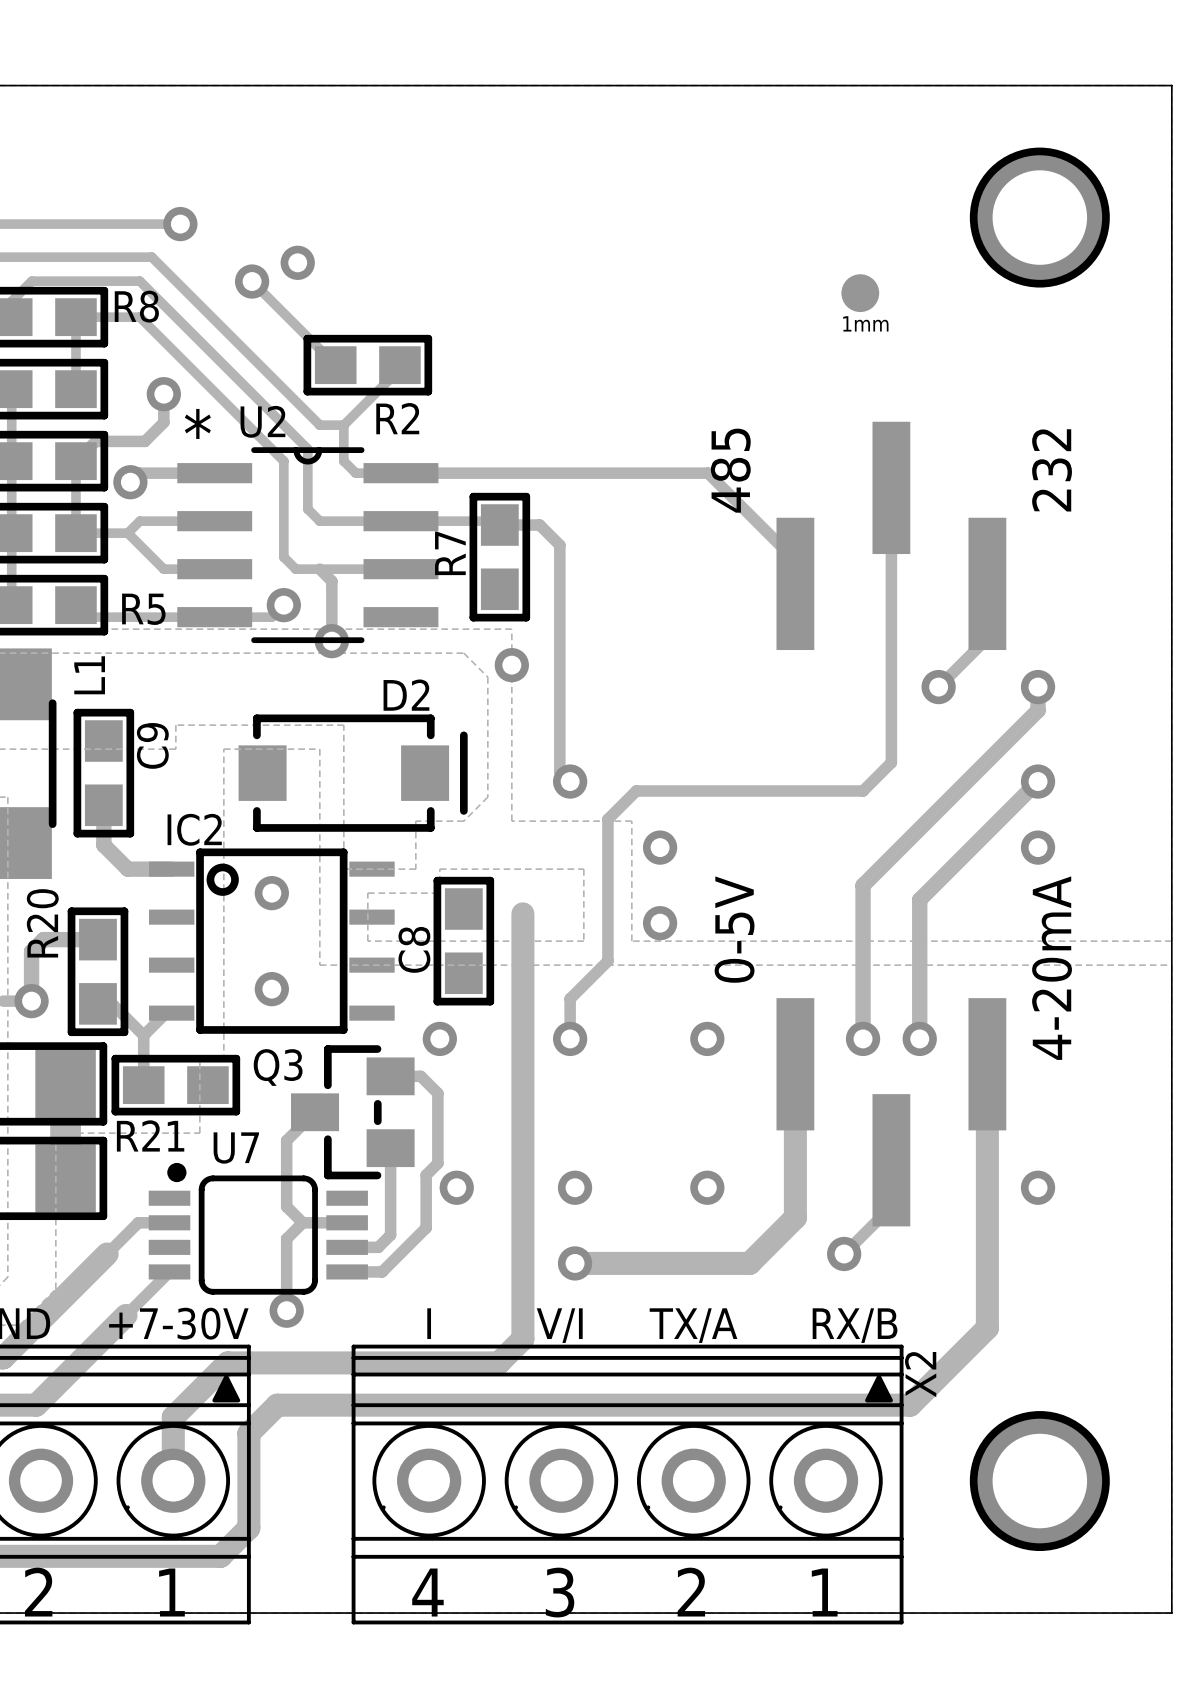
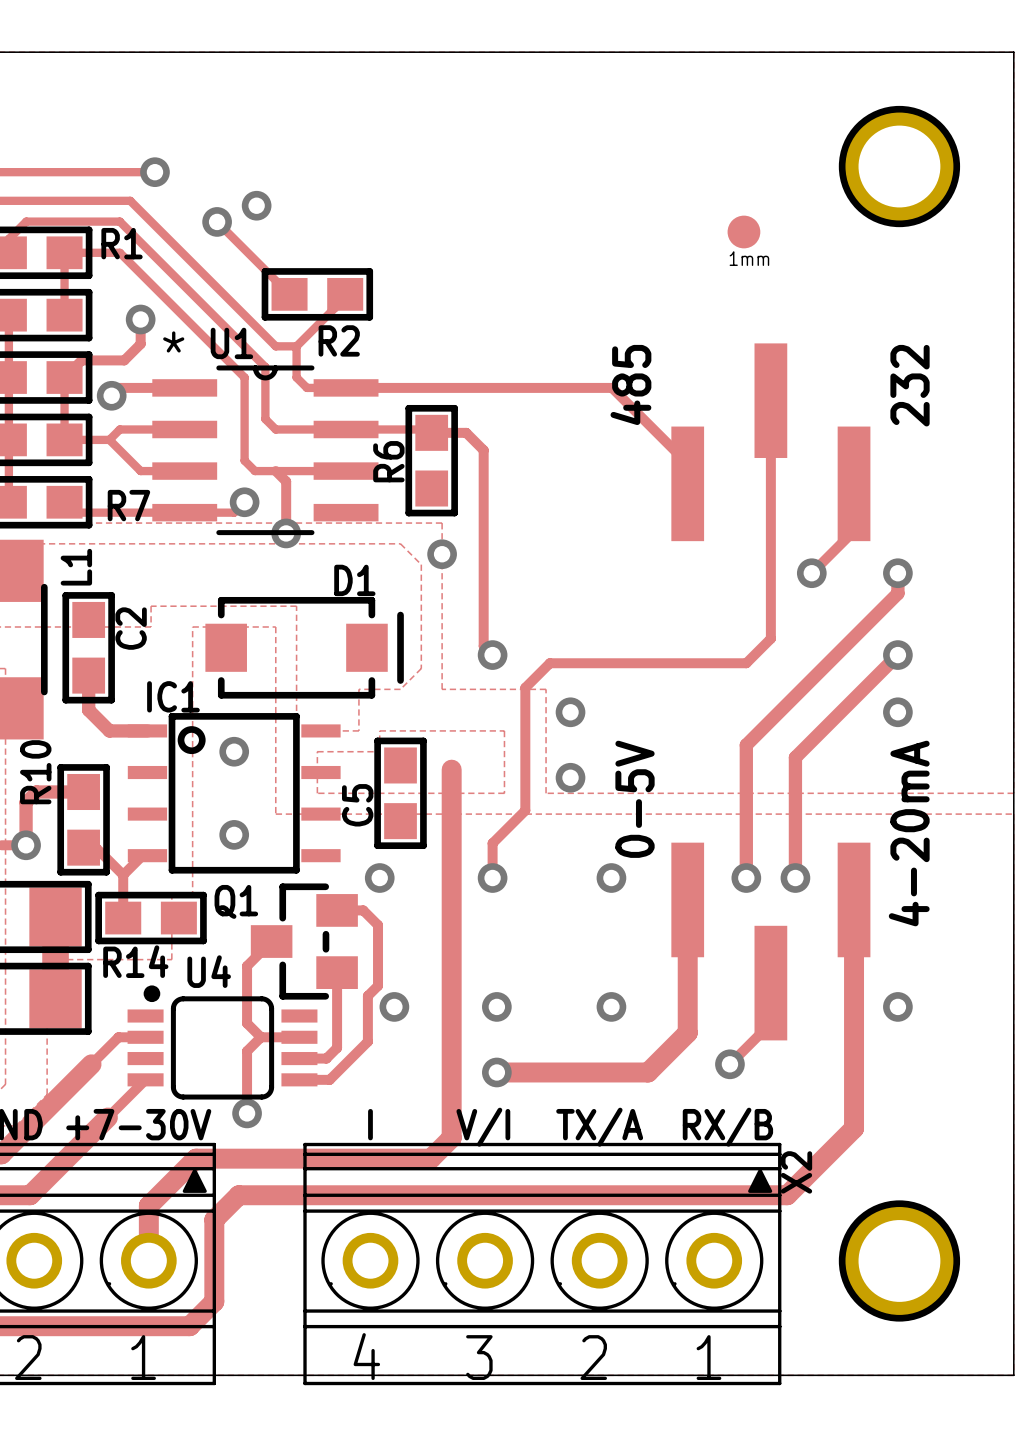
R8 name: R8 (136, 306) -> R1 (122, 243)
U2 name: U2 (262, 421) -> U1 (231, 343)
R7 name: R7 (450, 553) -> R6 (388, 461)
R5 name: R5 (143, 609) -> R7 (128, 505)
D2 name: D2 (406, 695) -> D1 (354, 580)
C9 name: C9 (152, 745) -> C2 (131, 628)
IC2 name: IC2 (194, 829) -> IC1 (173, 696)
R20 name: R20 (42, 923) -> R10 (35, 772)
C8 name: C8 (414, 949) -> C5 (357, 805)
Q3 name: Q3 (278, 1067) -> Q1 (236, 901)
R21 name: R21 (150, 1135) -> R14 (135, 961)
U7 name: U7 (236, 1148) -> U4 (209, 971)

